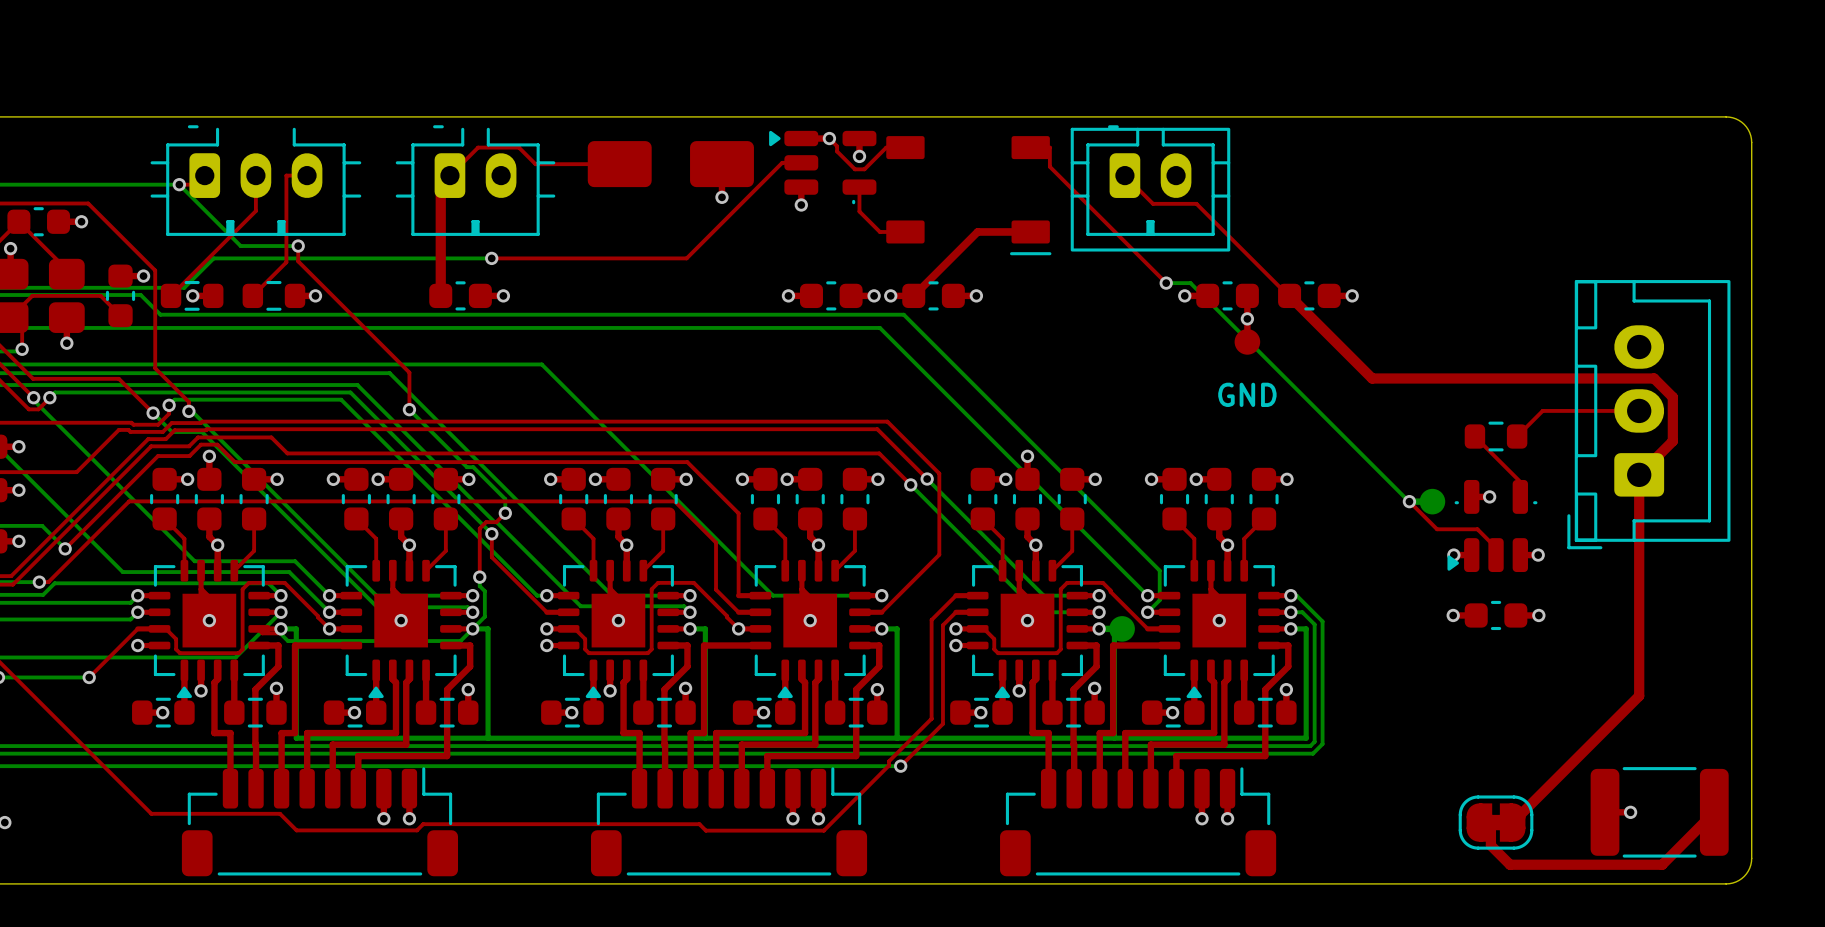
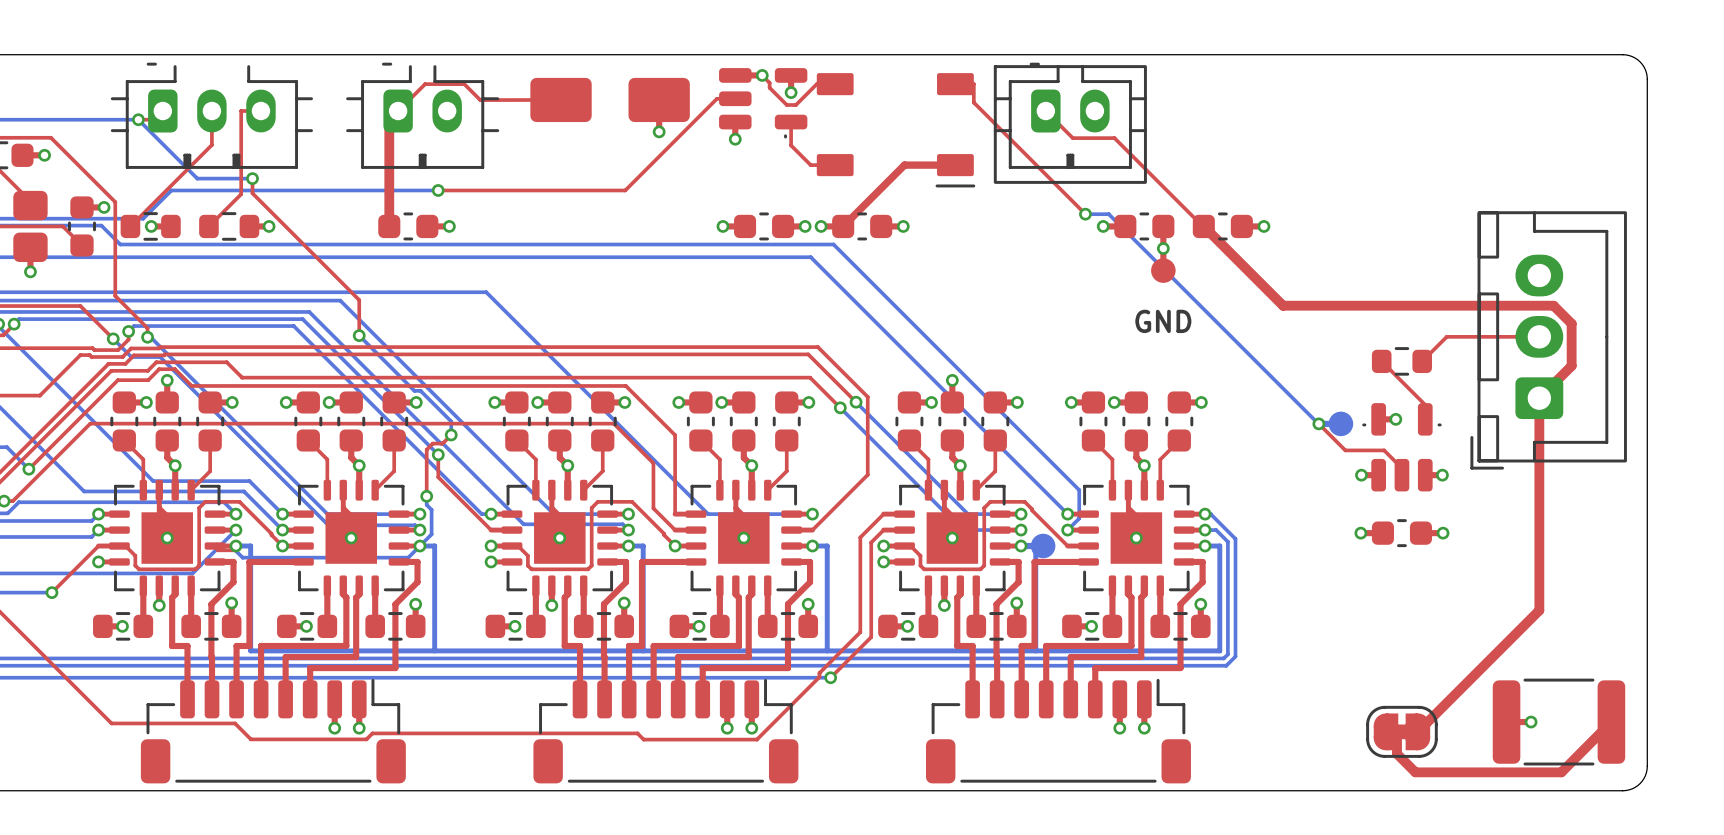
part footprint: [769, 130, 877, 205] -> [719, 68, 808, 139]
part footprint: [1447, 479, 1538, 573] -> [1362, 403, 1442, 492]
part footprint: [148, 559, 271, 699] -> [108, 479, 226, 597]
part footprint: [340, 559, 462, 699] -> [292, 479, 410, 597]
part footprint: [557, 559, 680, 699] -> [501, 479, 619, 597]
part footprint: [749, 559, 871, 699] -> [685, 479, 803, 597]
part footprint: [966, 559, 1089, 699] -> [894, 479, 1011, 597]
part footprint: [1158, 559, 1280, 699] -> [1078, 479, 1195, 597]

